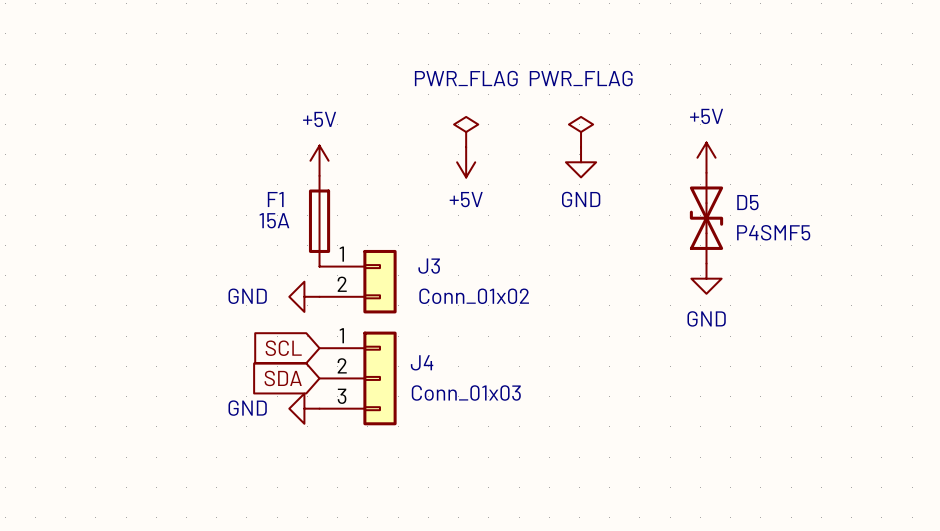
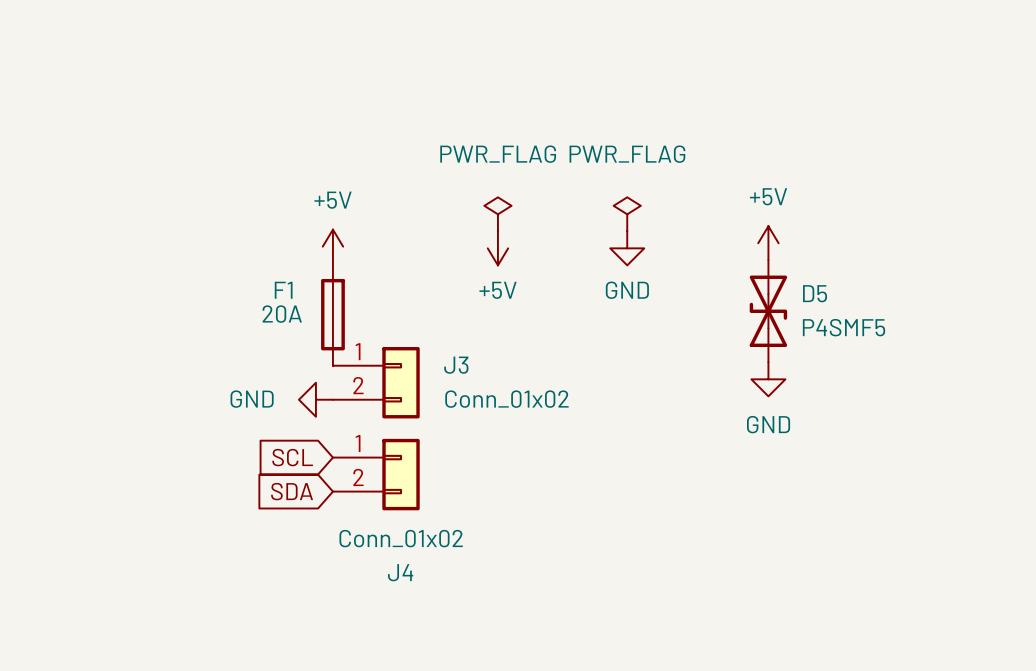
F1 value: 15A (274, 220) -> 20A (282, 314)
J4 symbol: [319, 331, 397, 426] -> [332, 438, 420, 511]
J4 name position: J4 (422, 362) -> J4 (400, 572)
J4 value: Conn_01x03 (466, 393) -> Conn_01x02 (401, 538)
power symbol: GND (304, 408) -> none

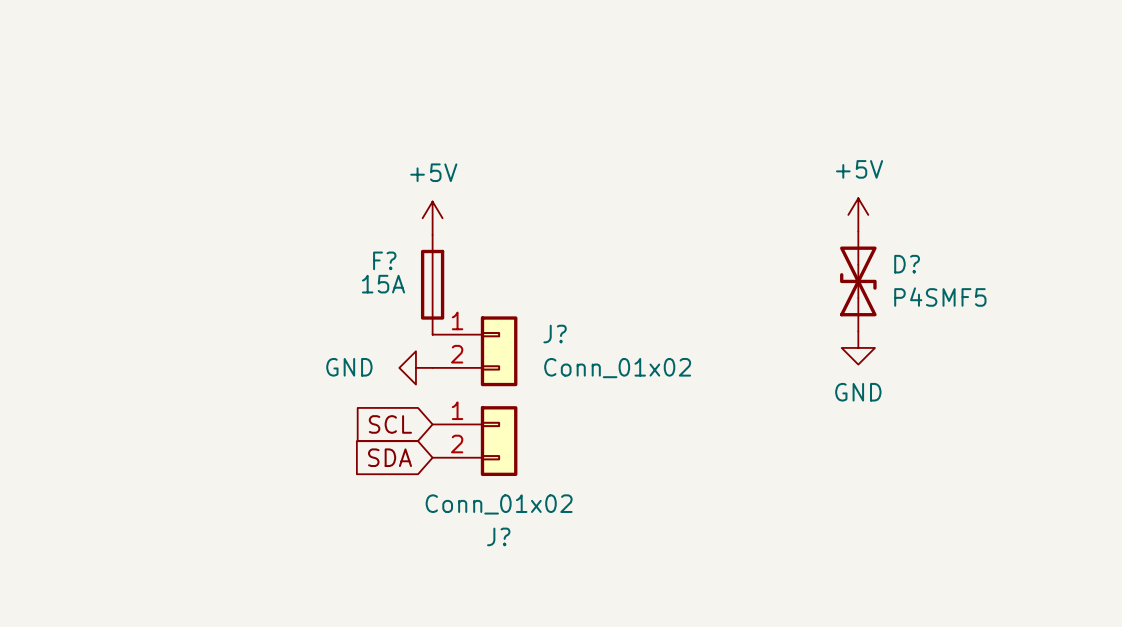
power symbol: PWR_FLAG (497, 214) -> none
power symbol: PWR_FLAG (627, 214) -> none
power symbol: +5V (497, 248) -> none
power symbol: GND (627, 248) -> none
F1 name: F1 (283, 290) -> F? (384, 260)
D5 name: D5 (815, 293) -> D? (907, 264)
F1 value: 20A (282, 314) -> 15A (383, 284)
J3 name: J3 (456, 365) -> J? (555, 334)
J4 name: J4 (400, 572) -> J? (498, 536)

